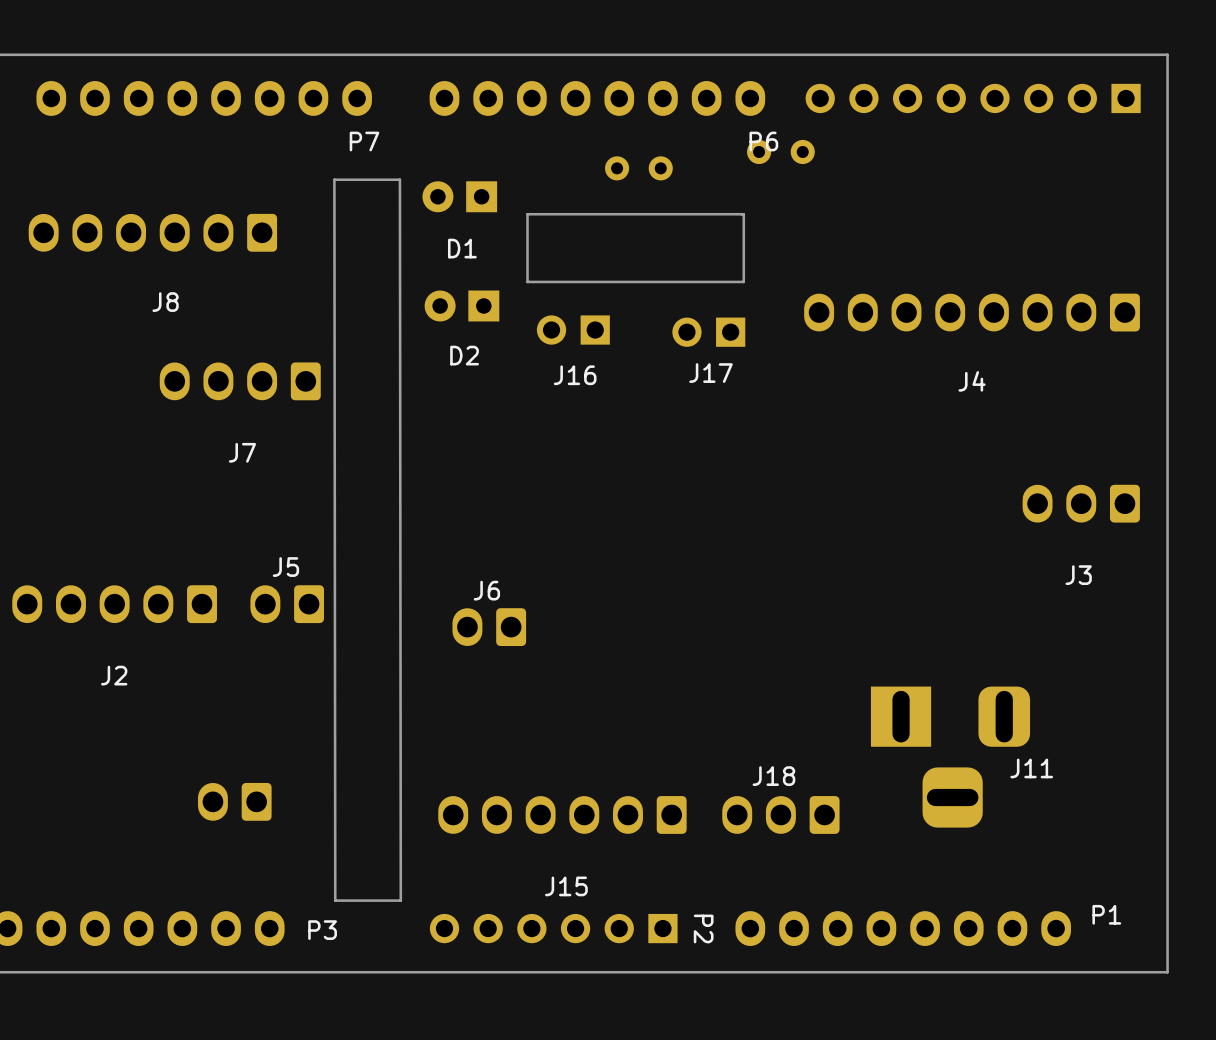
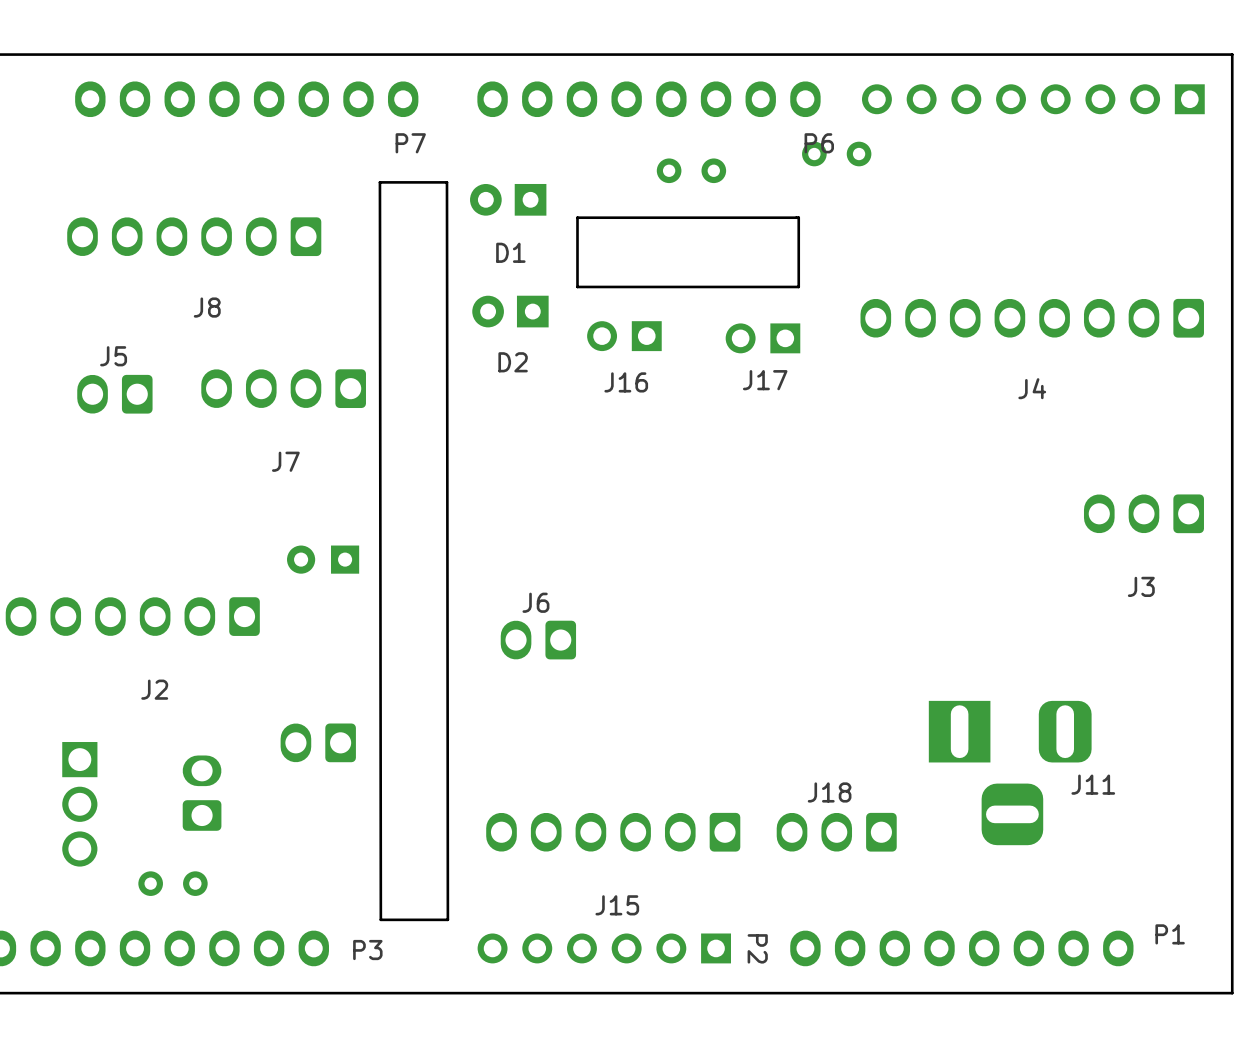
part: none -> (323, 559)
J5 position: (287, 604) -> (114, 394)
part: none -> (318, 742)
part: none -> (202, 793)
part: none -> (79, 804)
part: (234, 801) -> none
part: none -> (173, 883)

